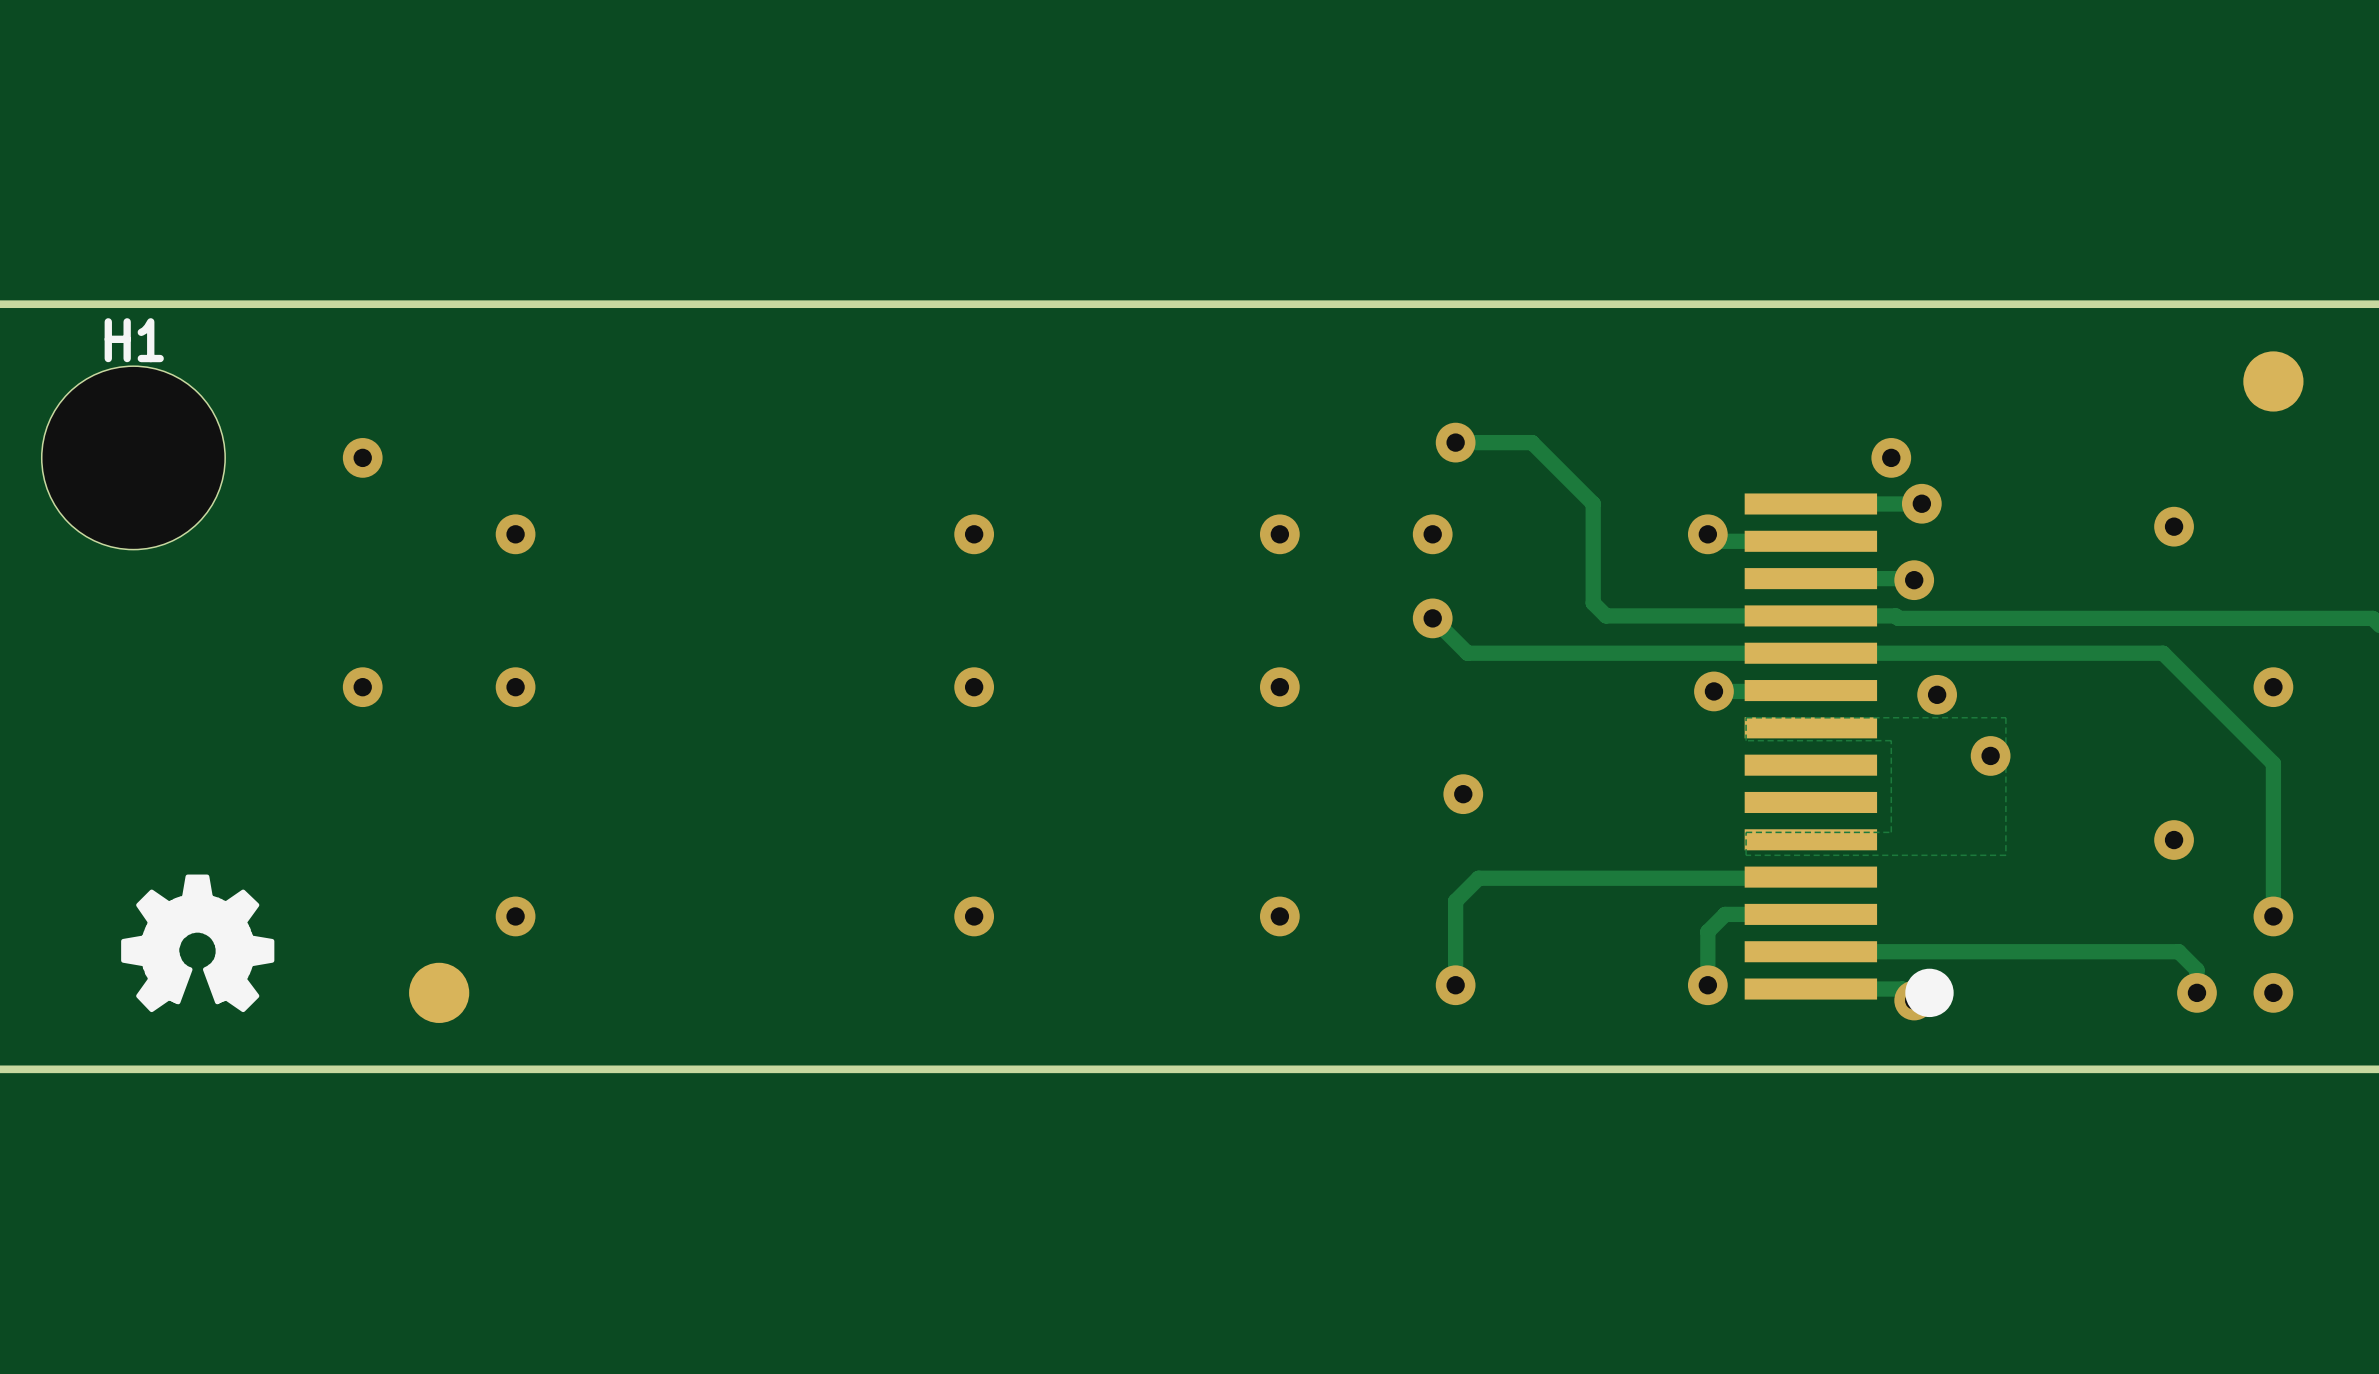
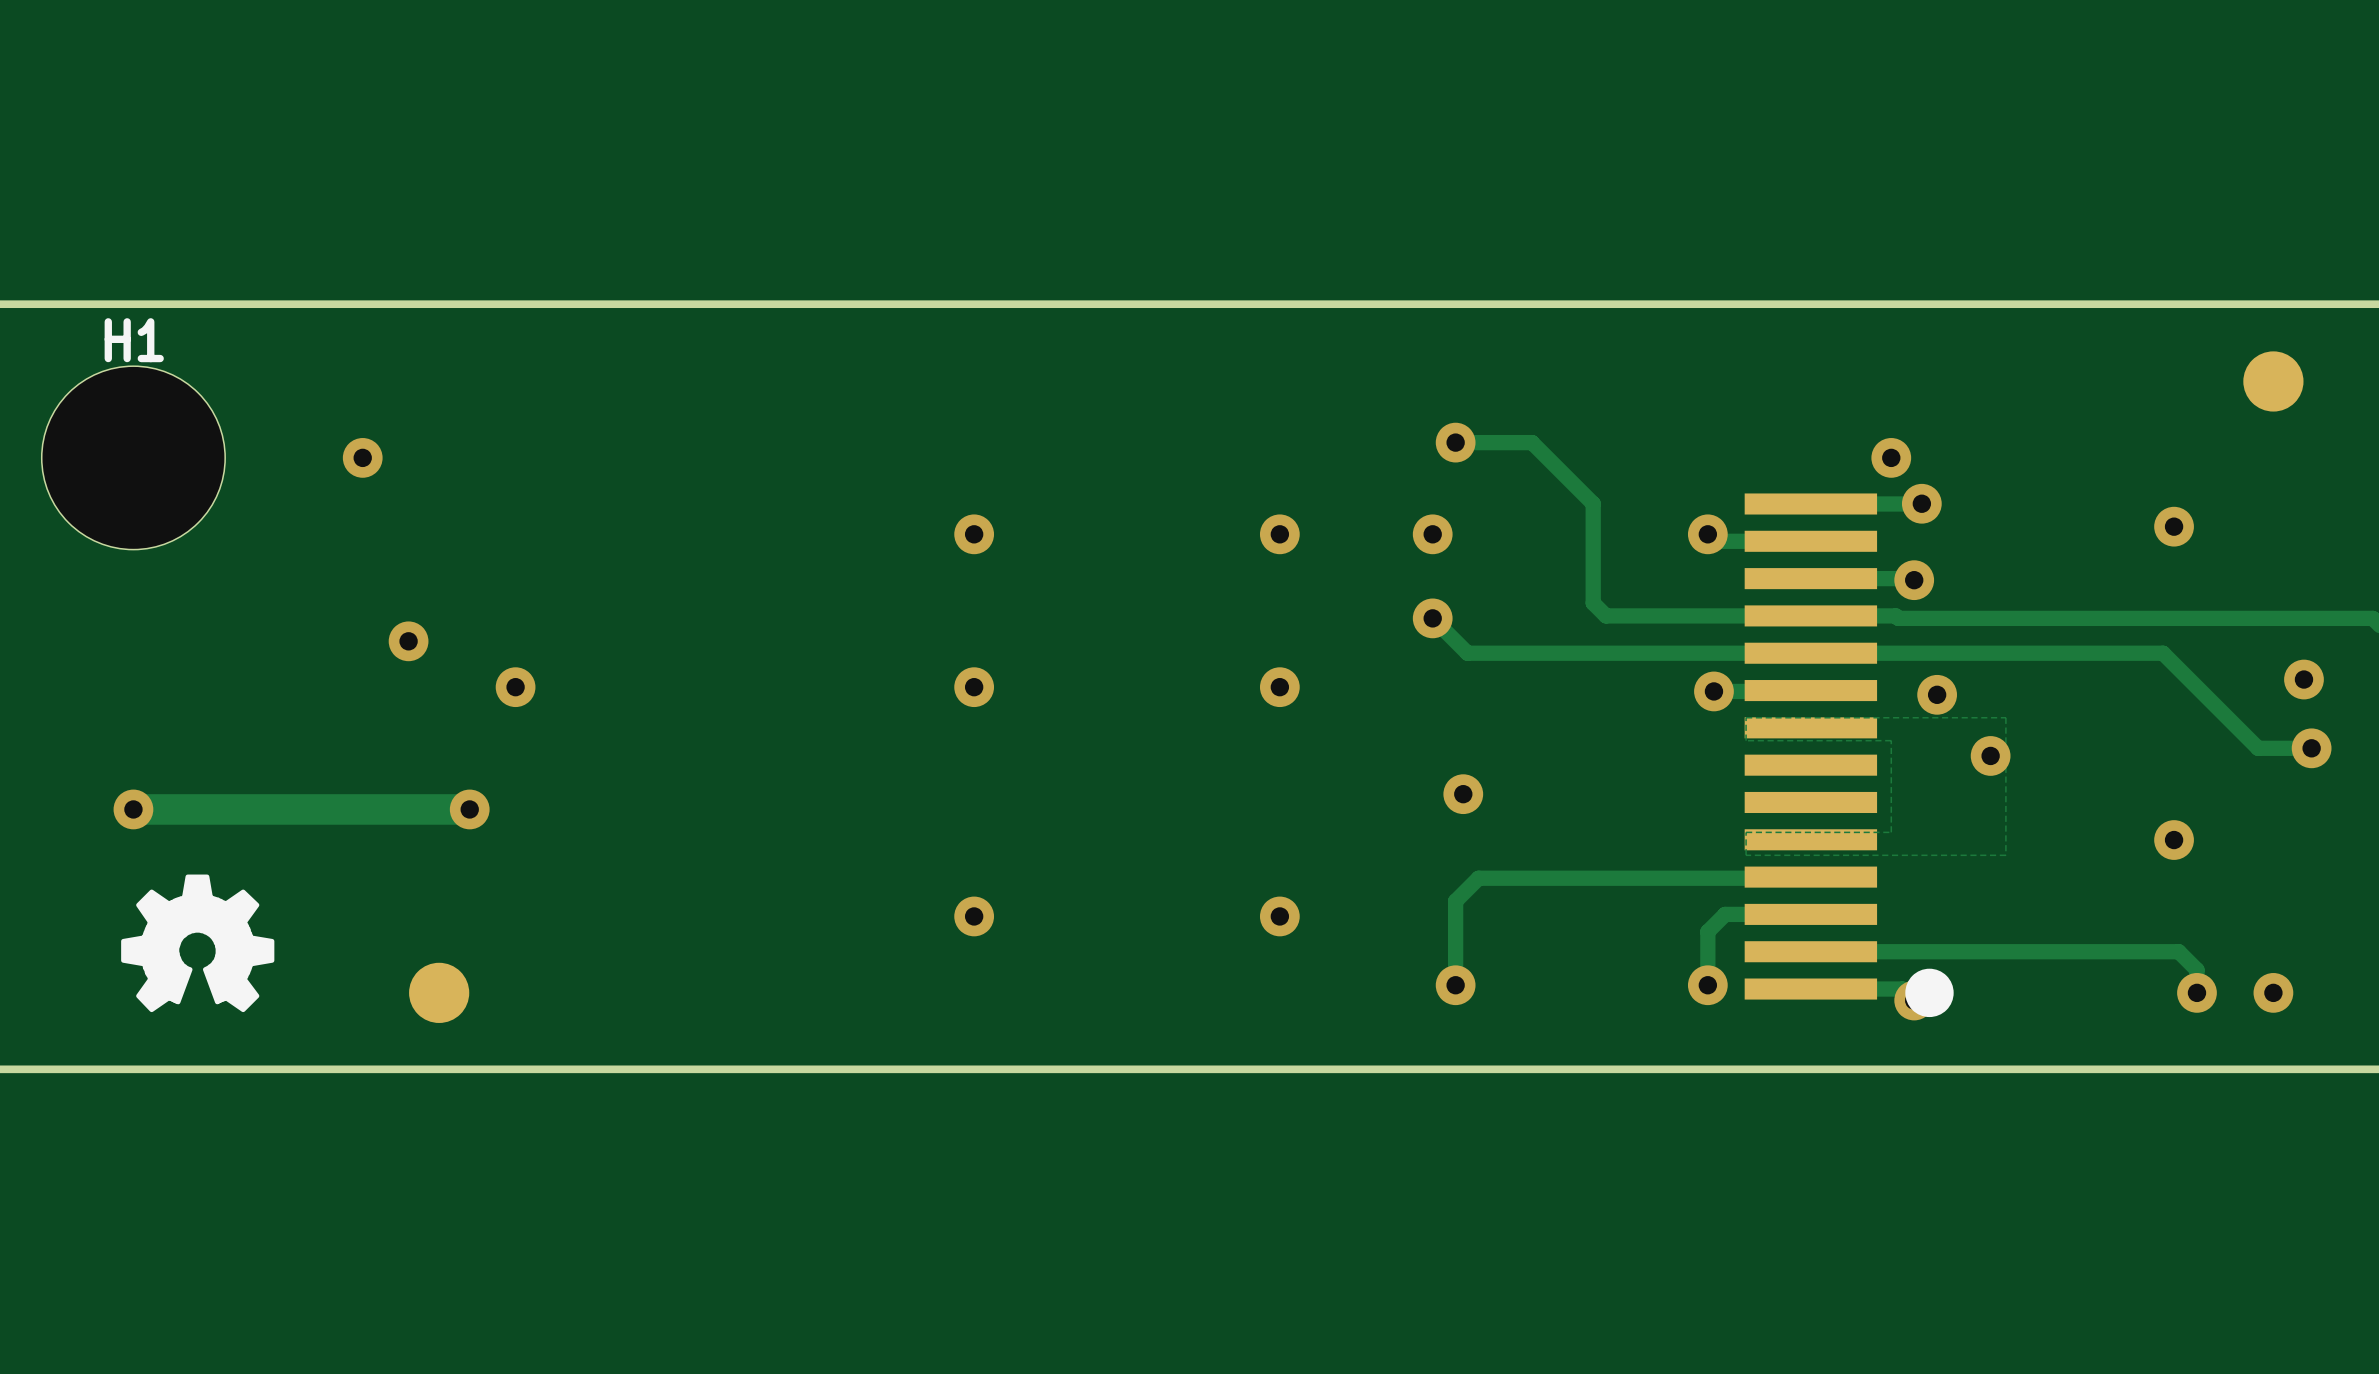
via: (515, 534) -> none
via position: (362, 687) -> (408, 641)
via position: (2273, 687) -> (2303, 679)
track: (2258, 748) (2273, 763) (2273, 916) -> (2258, 748) (2311, 748)
via: none -> (2311, 748)
track: none -> (133, 809) (469, 809)
via: none -> (133, 809)
via: none -> (469, 809)
via: (515, 916) -> none
via: (2273, 916) -> none

